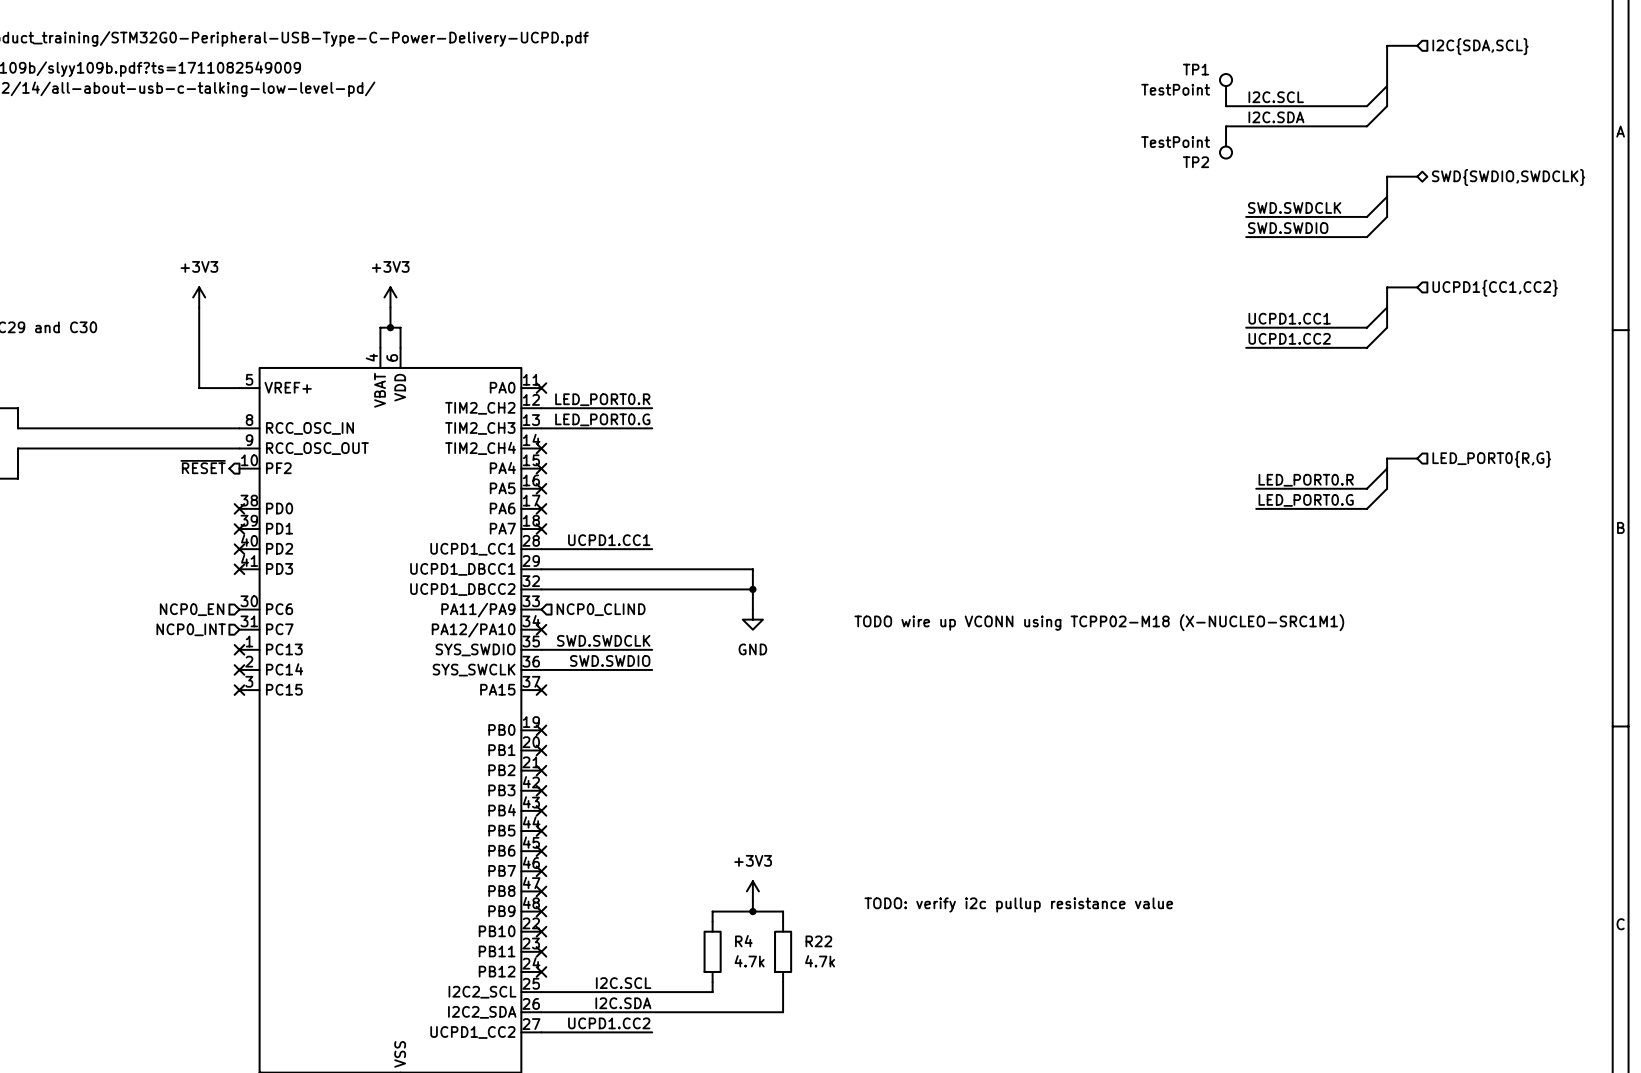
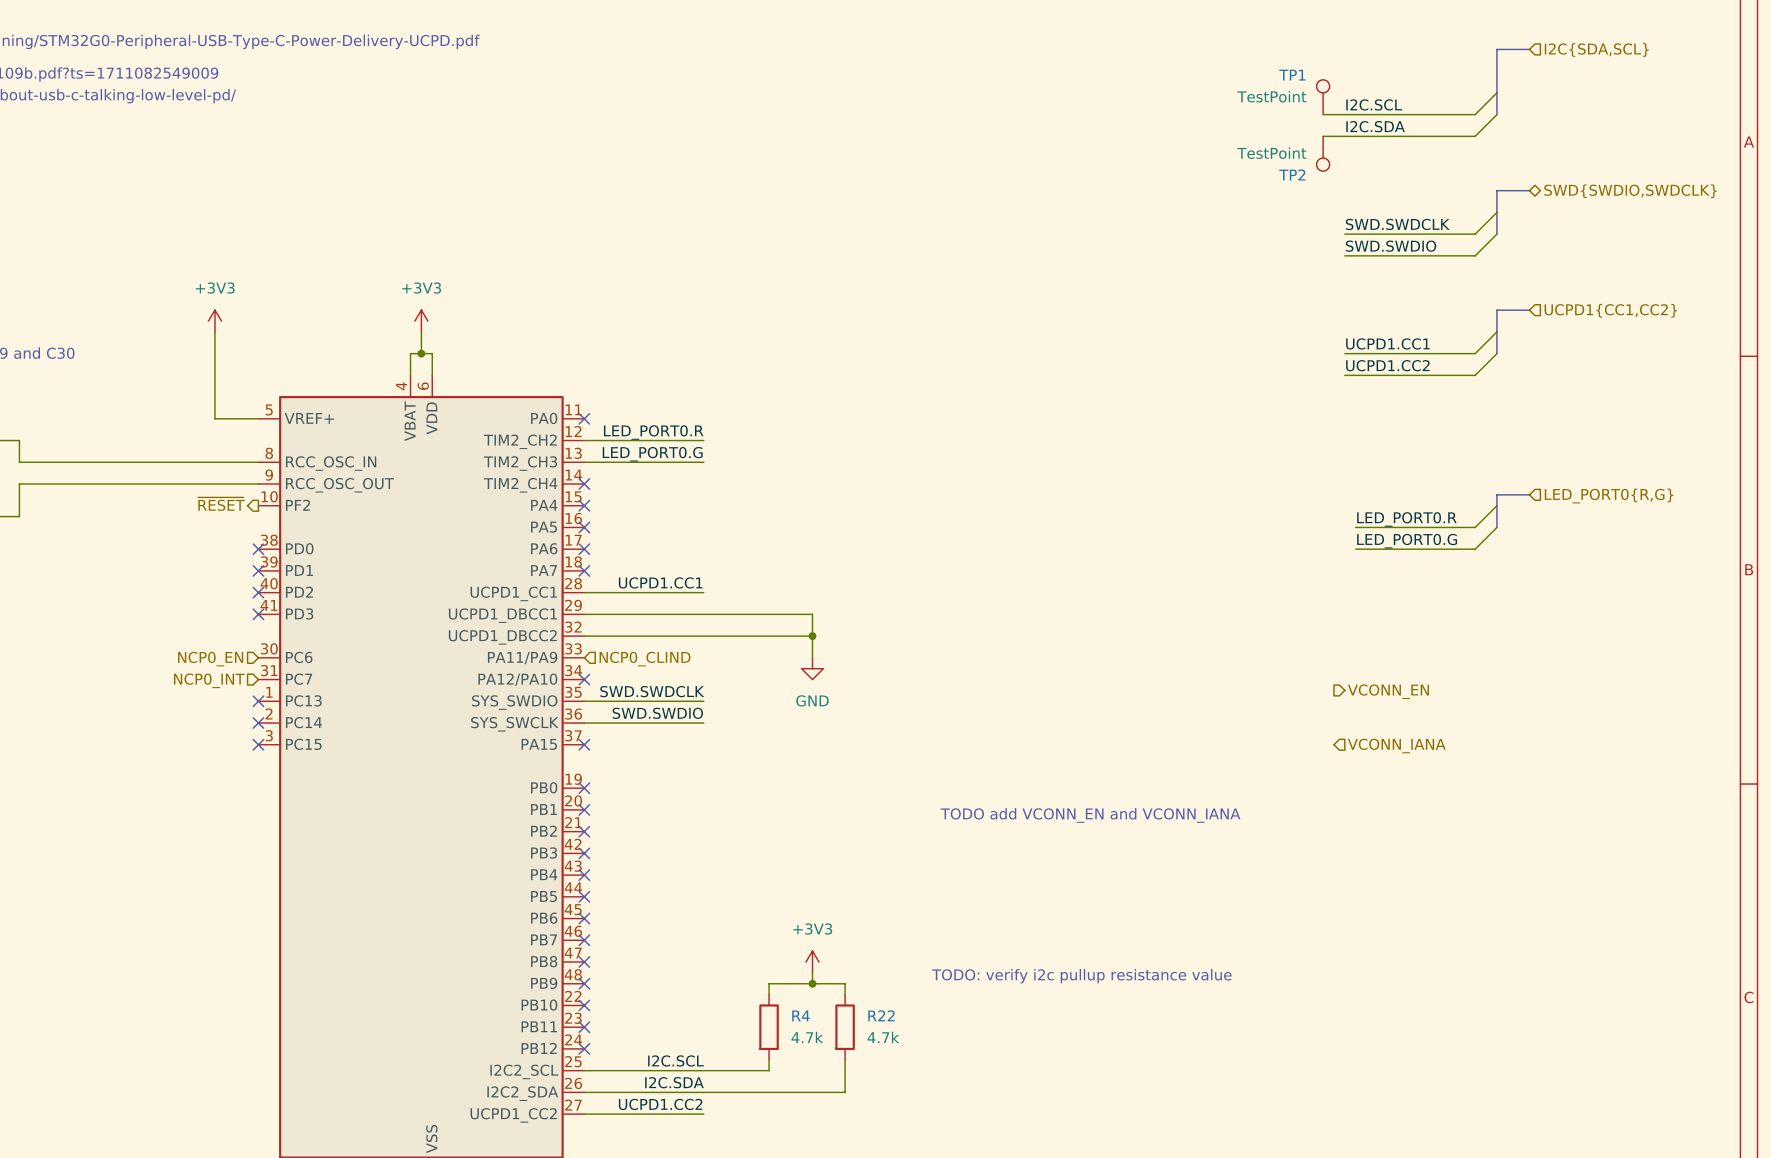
text: TODO wire up VCONN using TCPP02-M18 (X-NUCLEO-SRC1M1) (1099, 622) -> none
hierarchical label: none -> VCONN_EN (1388, 691)
hierarchical label: none -> VCONN_IANA (1396, 745)
text: none -> TODO add VCONN_EN and VCONN_IANA (1090, 815)

